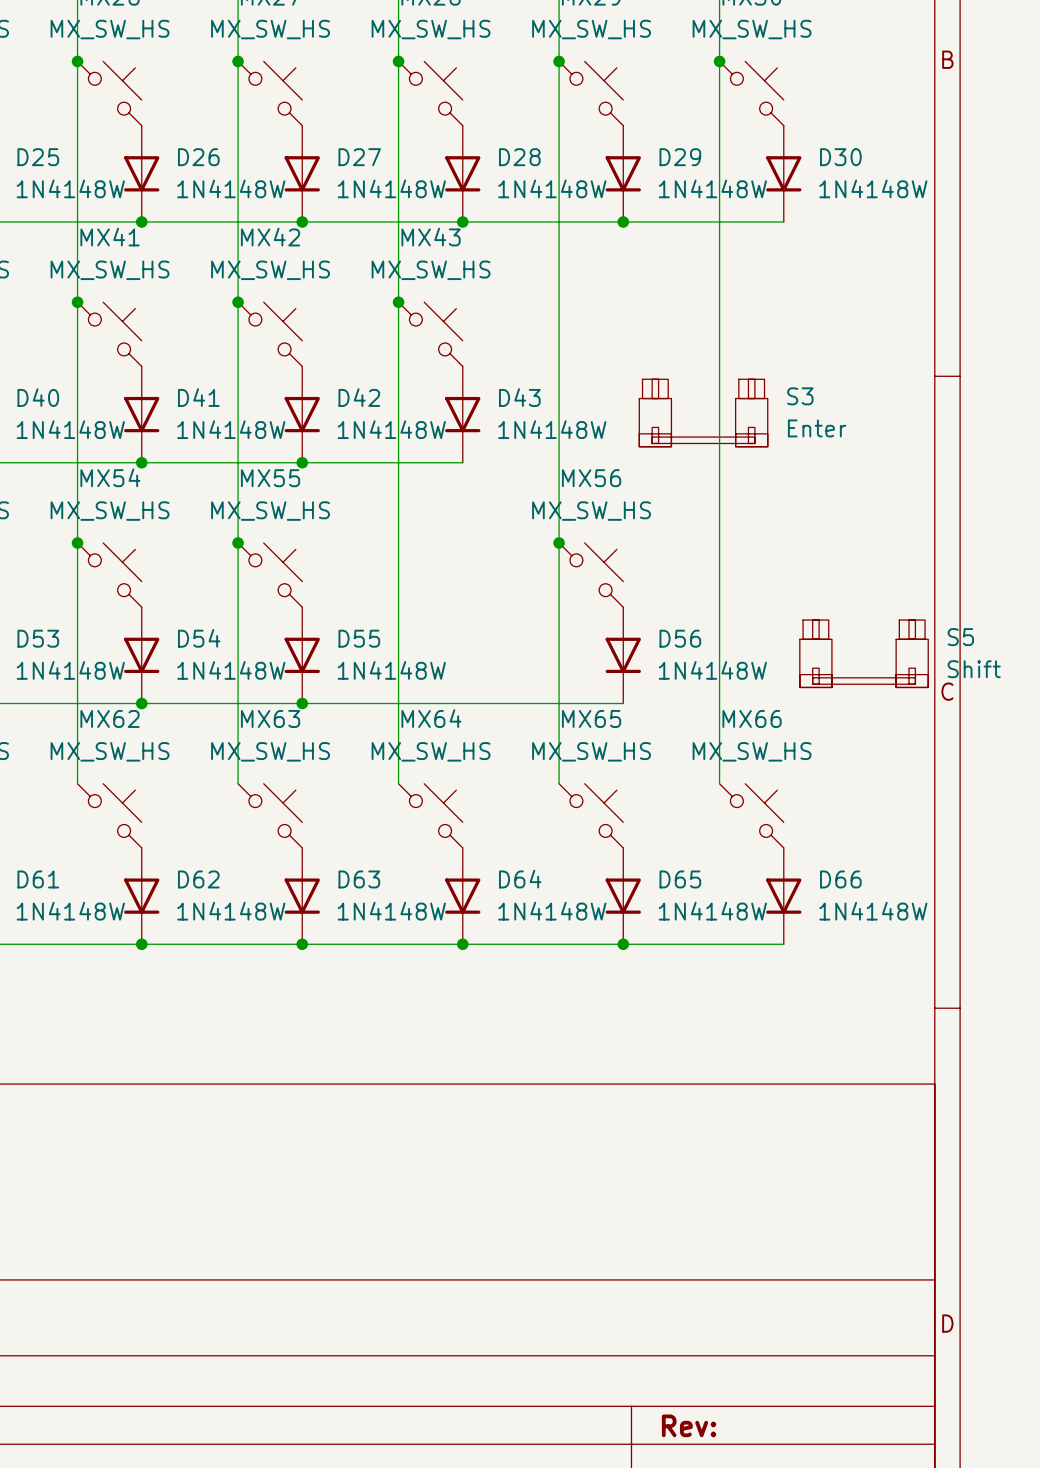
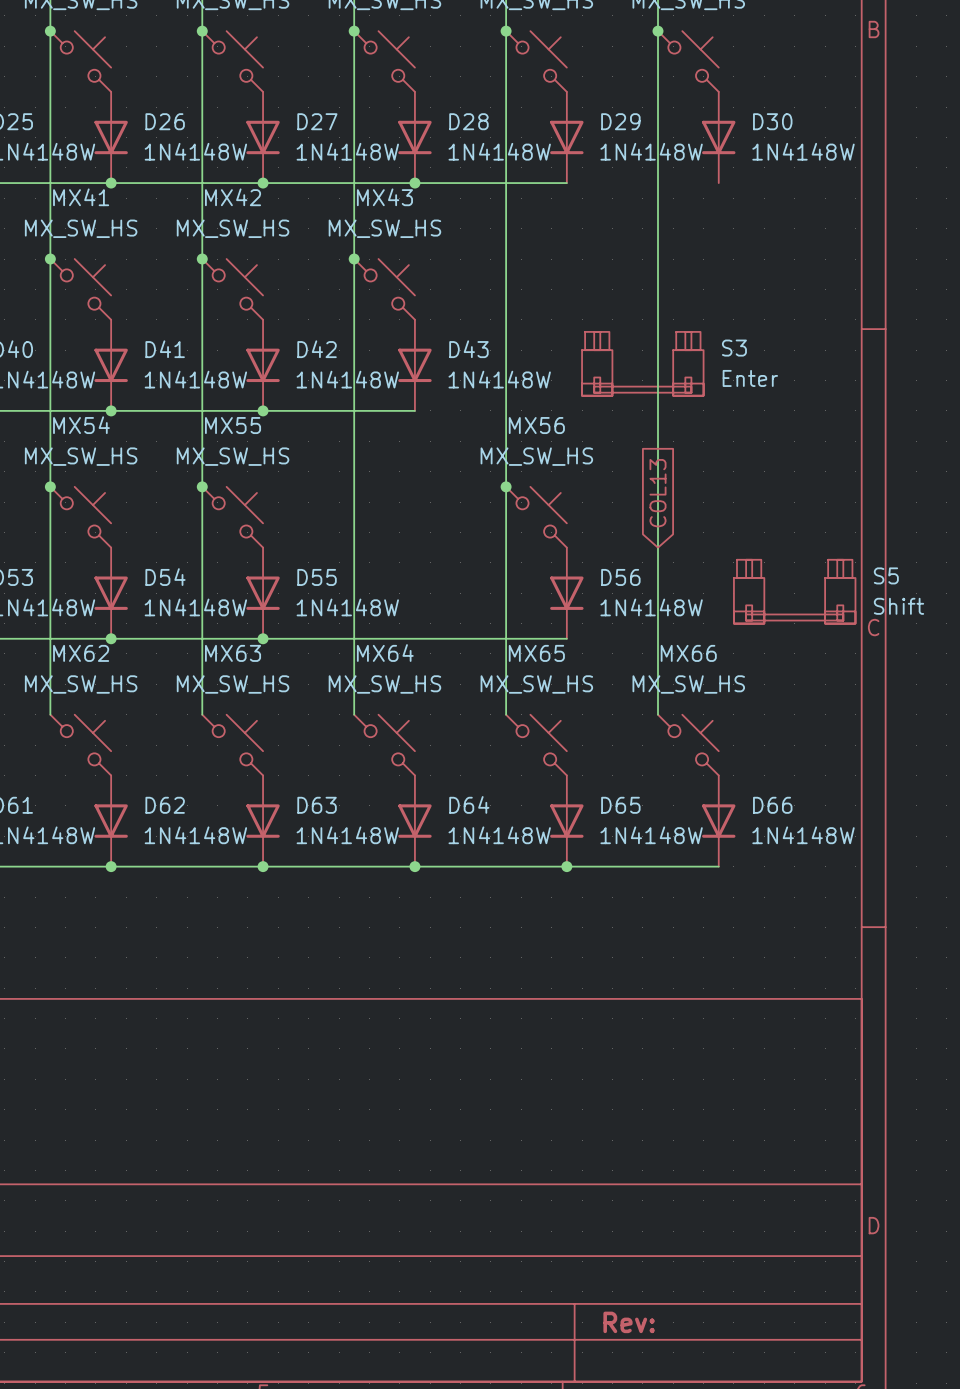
wire: (623, 221) (783, 221) -> none
junction: (623, 221) -> none
global label: none -> COL13 (658, 493)

